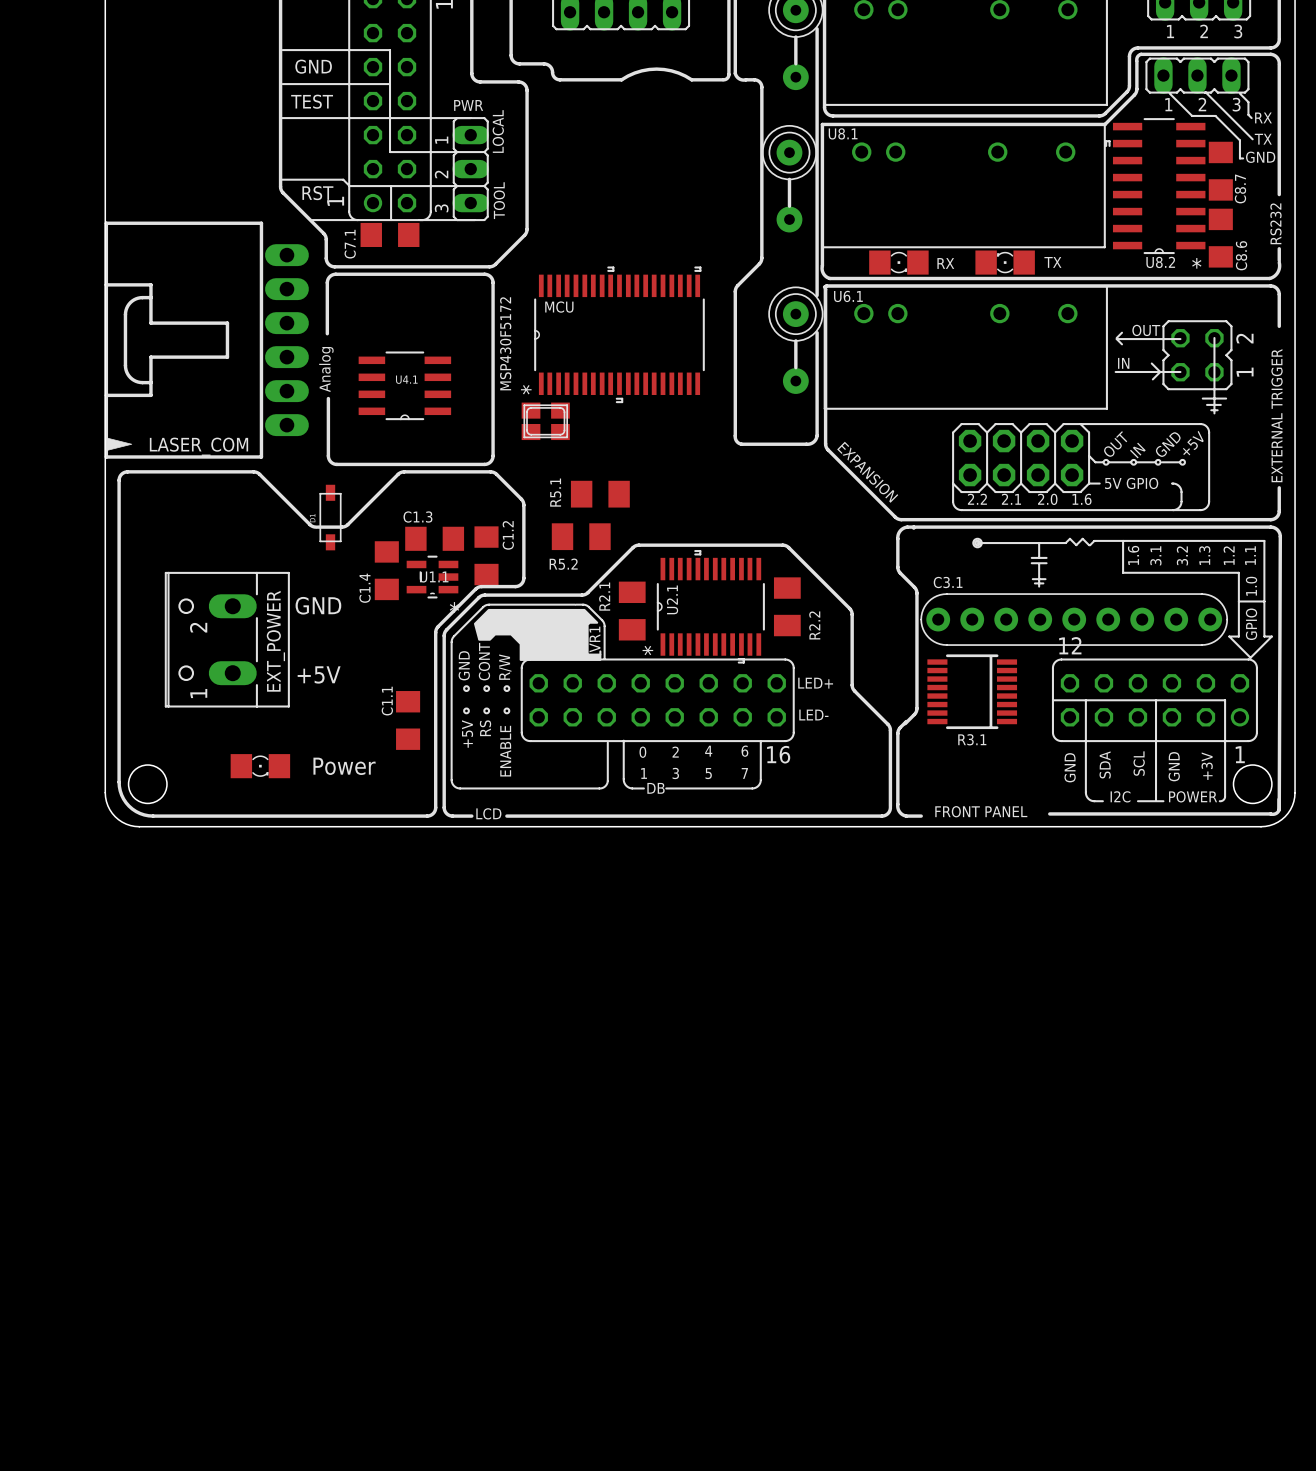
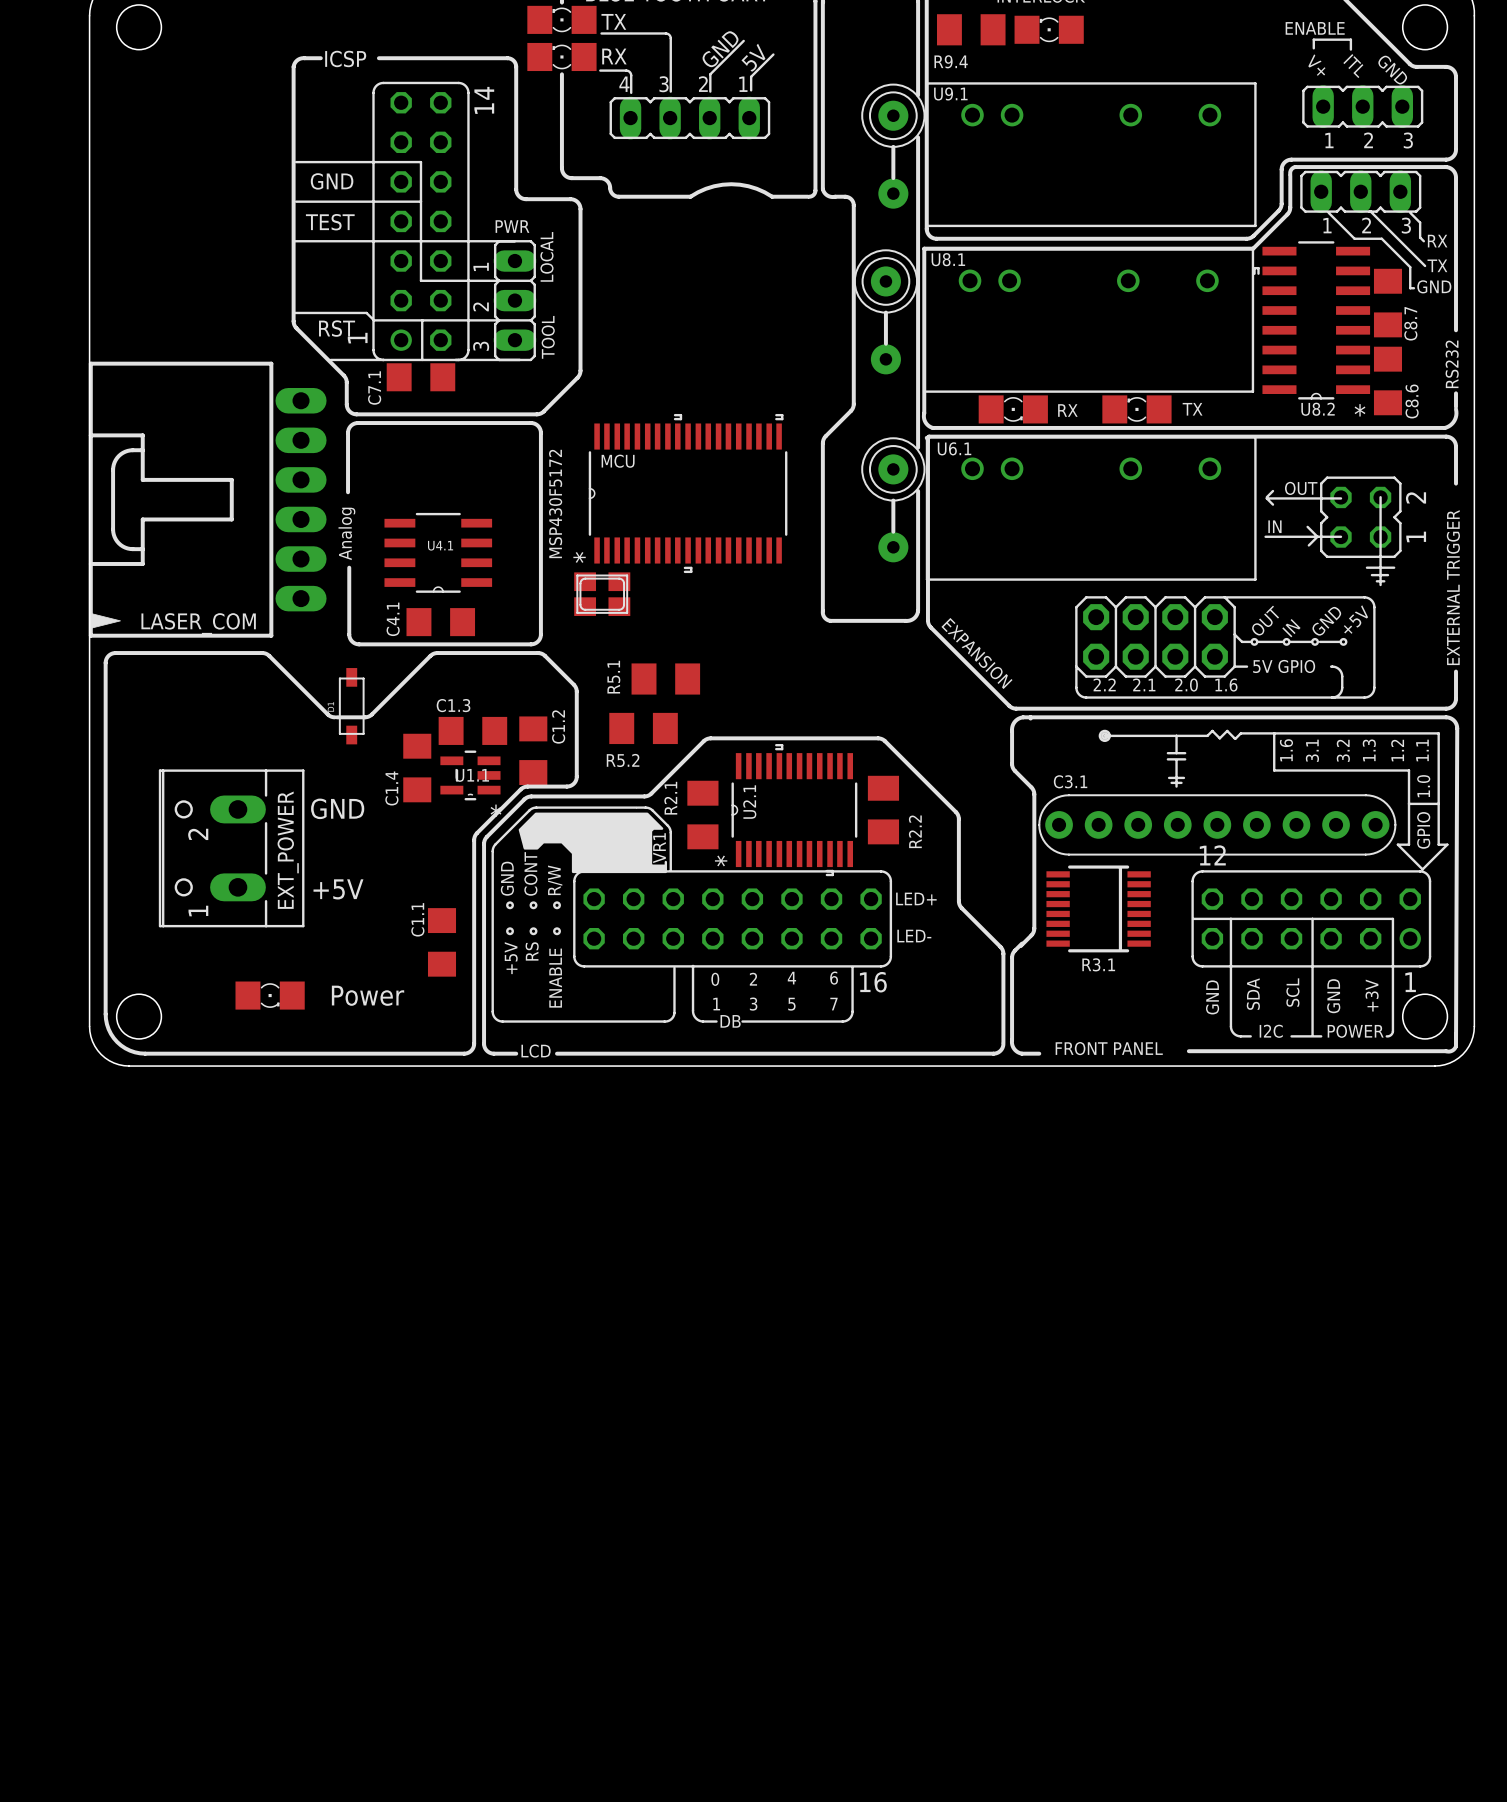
C4.1: none -> (440, 622)

